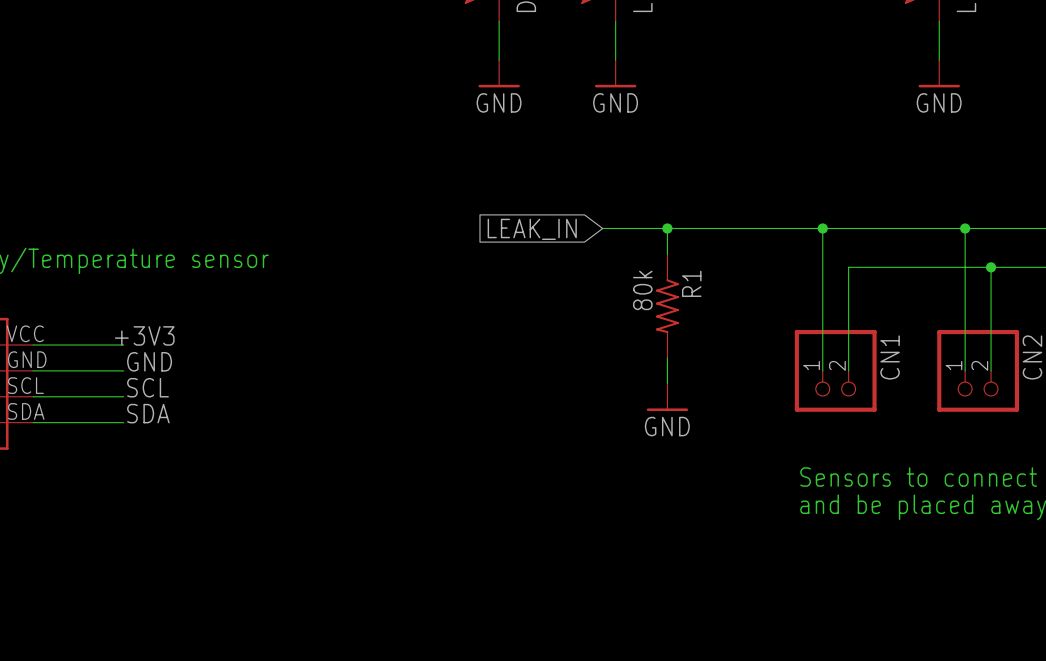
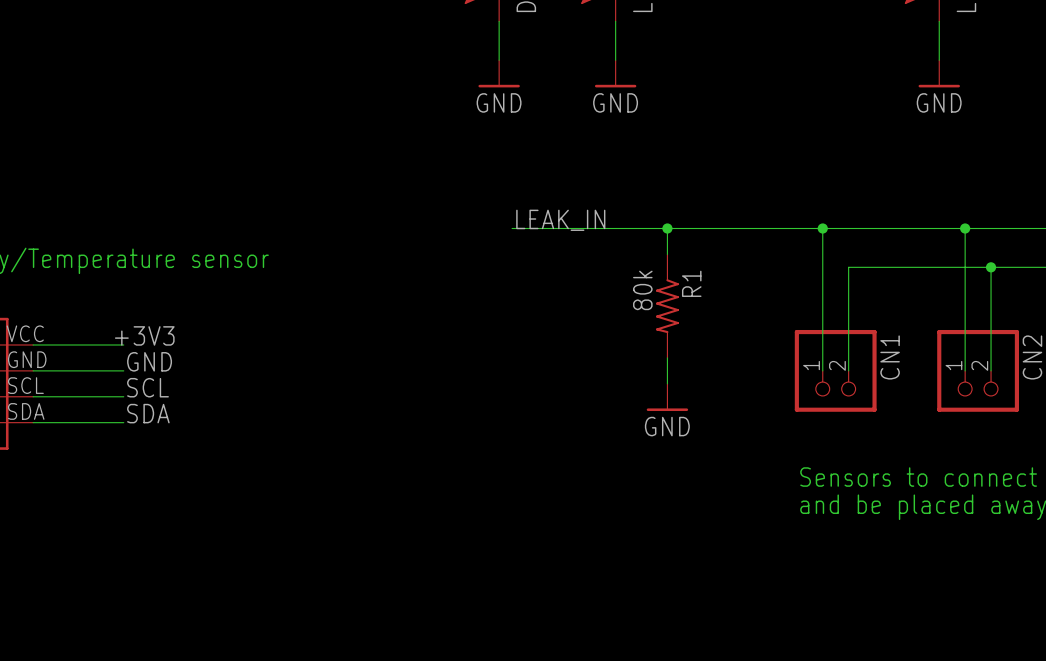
label: none -> LEAK_IN (560, 220)
wire: none -> (512, 228) (602, 228)
global label: LEAK_IN (532, 229) -> none

